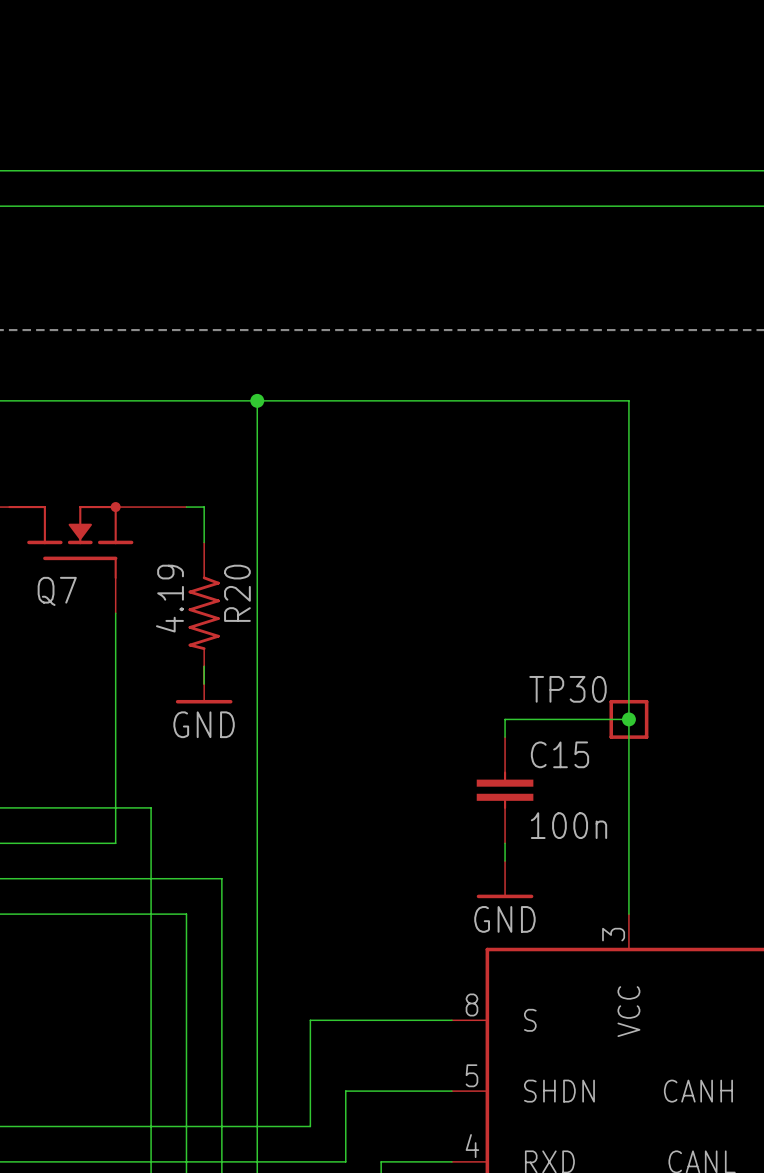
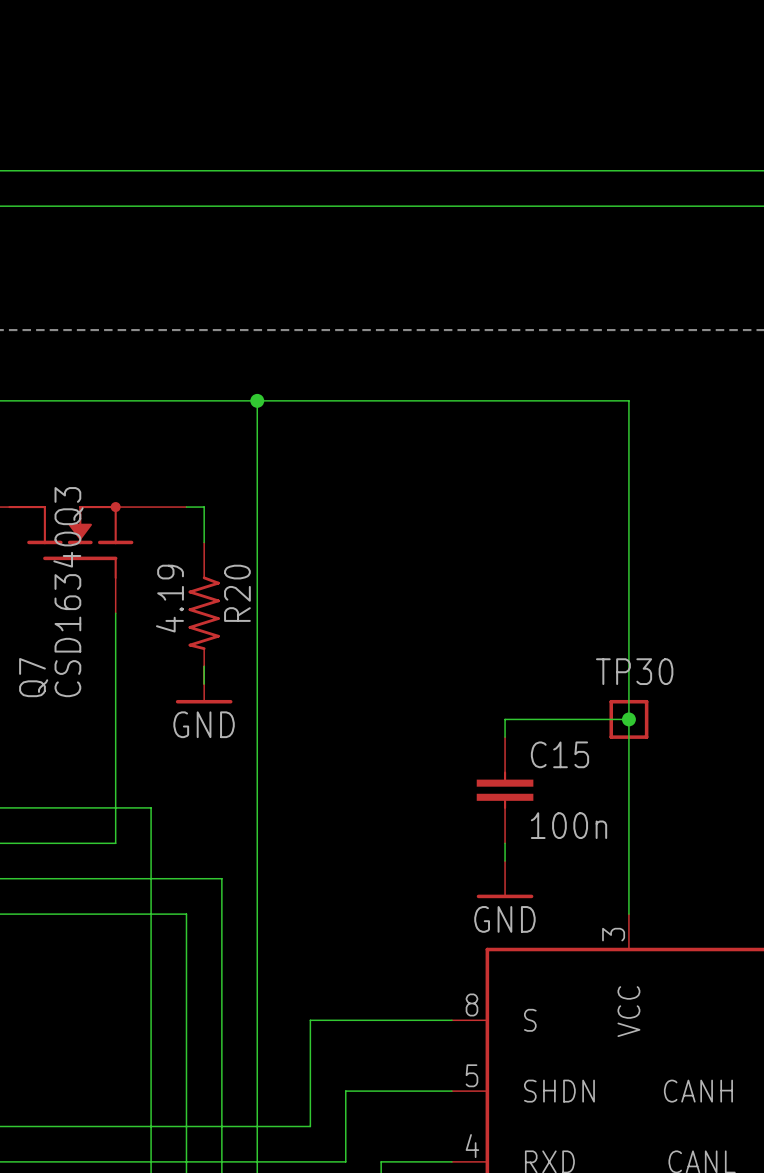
Q7 name rotation: 0° (57, 591) -> 90° counterclockwise (33, 677)
Q7 name position: Q7 (57, 591) -> Q7 (33, 677)
Q7 value: none -> CSD16340Q3 (68, 592)
TP30 name position: TP30 (567, 689) -> TP30 (634, 671)

